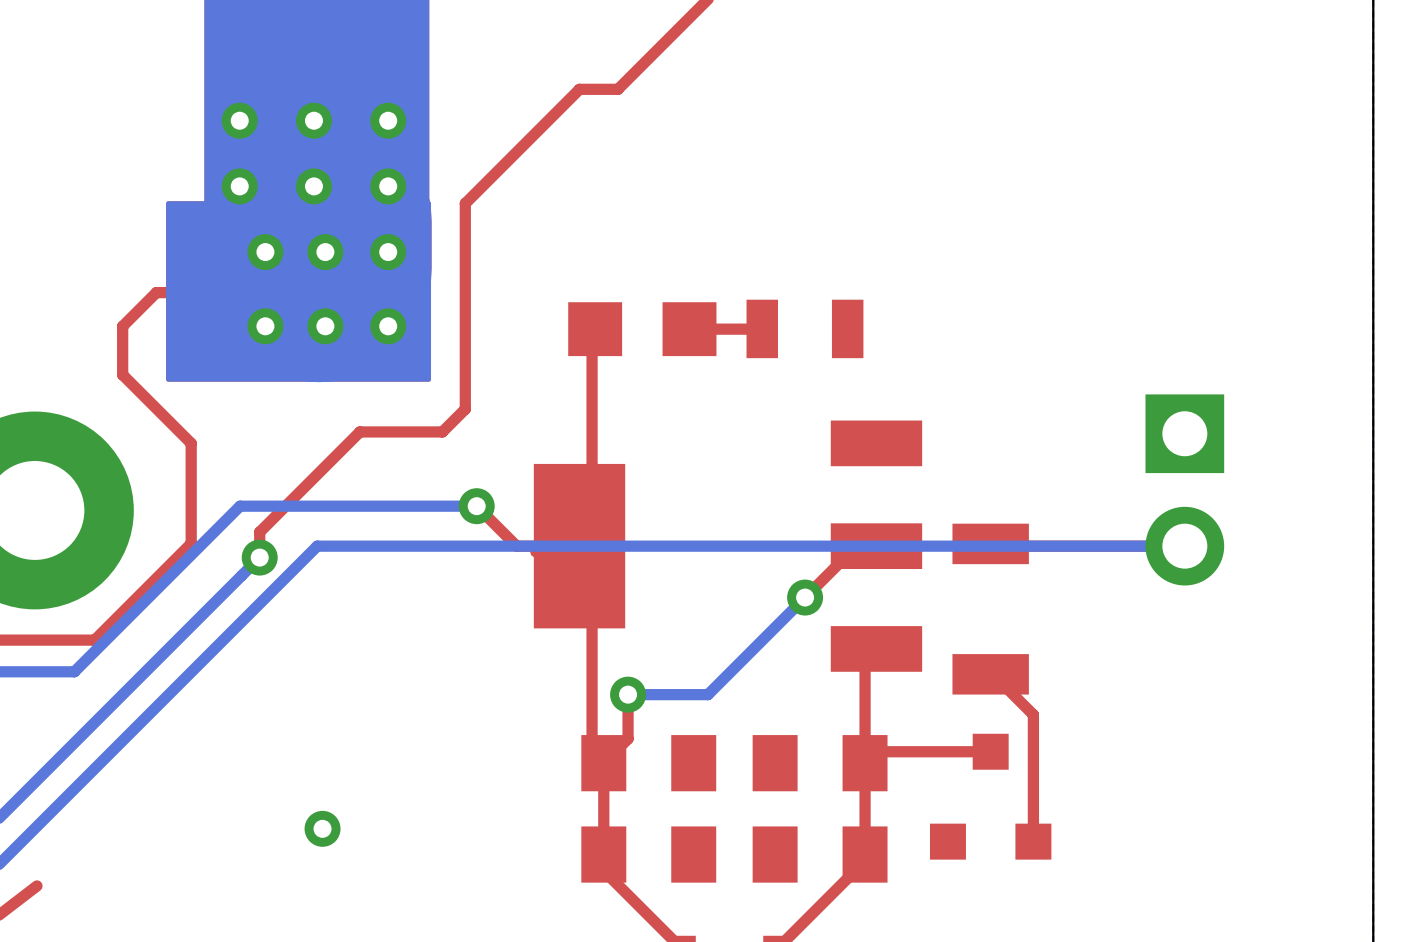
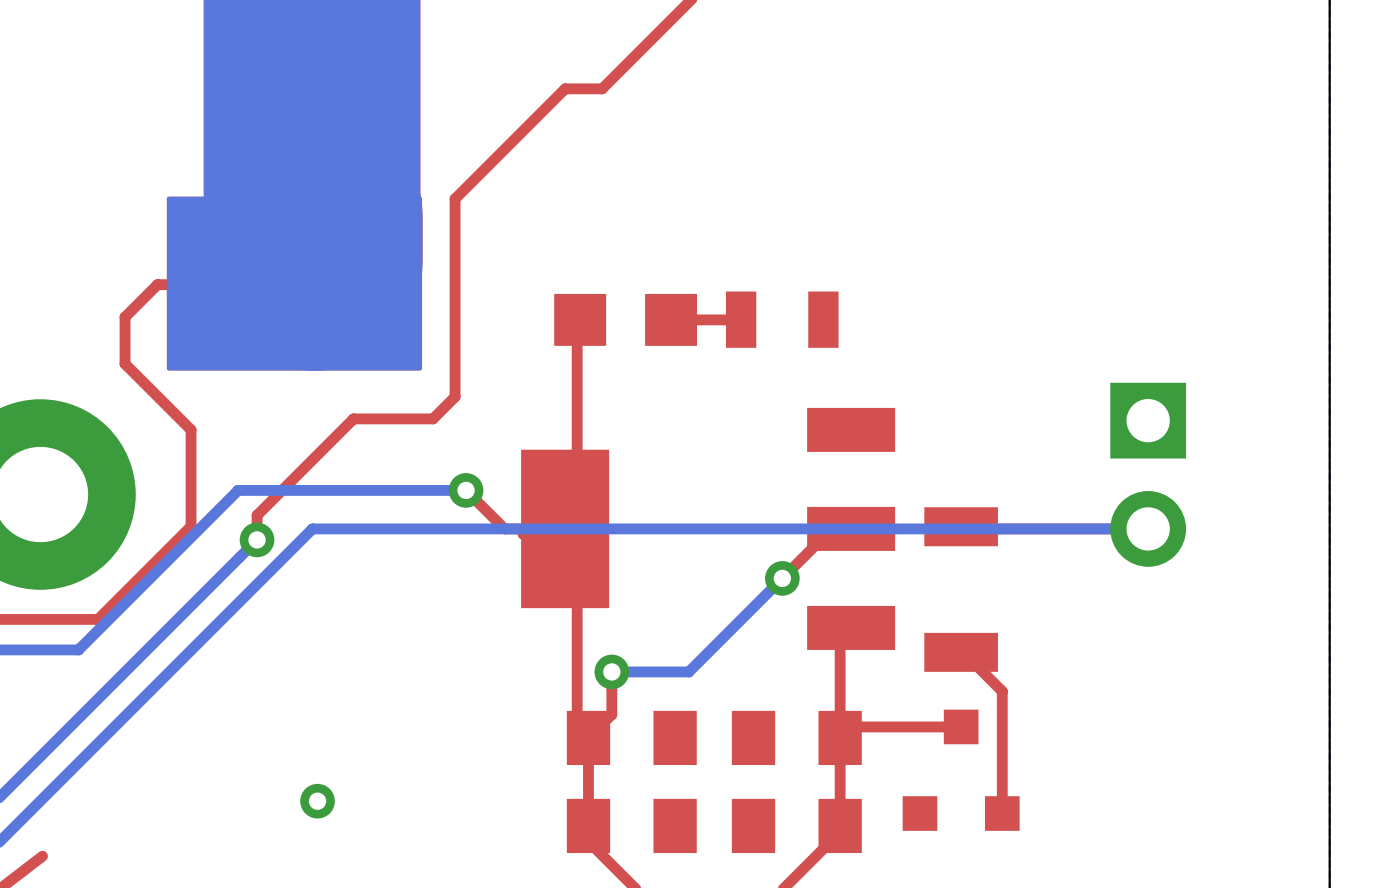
via: (239, 120) -> none
via: (313, 120) -> none
via: (388, 120) -> none
via: (239, 186) -> none
via: (313, 186) -> none
via: (388, 186) -> none
via: (265, 252) -> none
via: (325, 252) -> none
via: (388, 252) -> none
via: (265, 326) -> none
via: (325, 326) -> none
via: (388, 326) -> none

